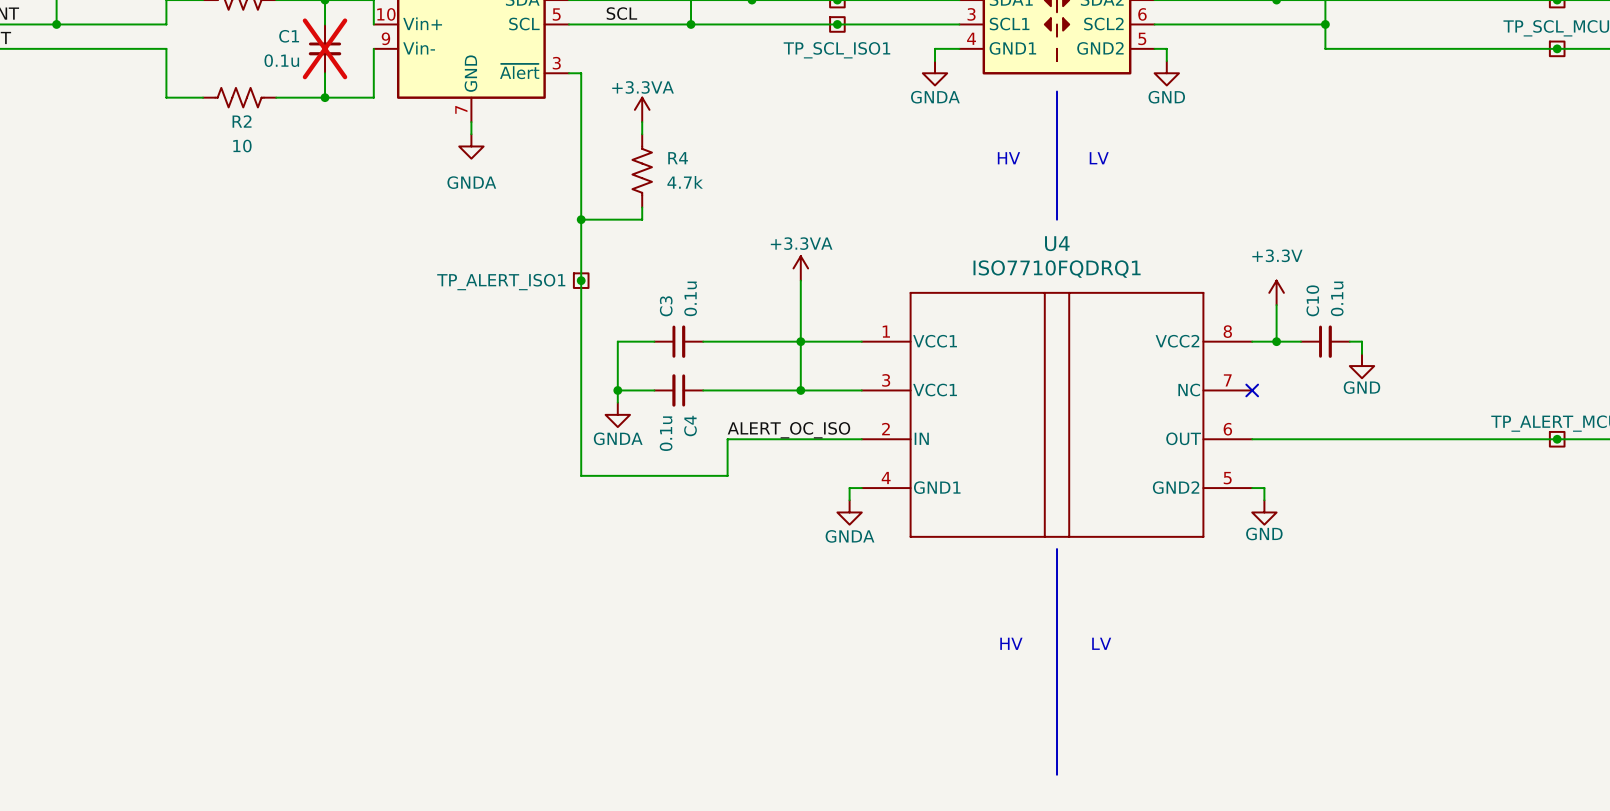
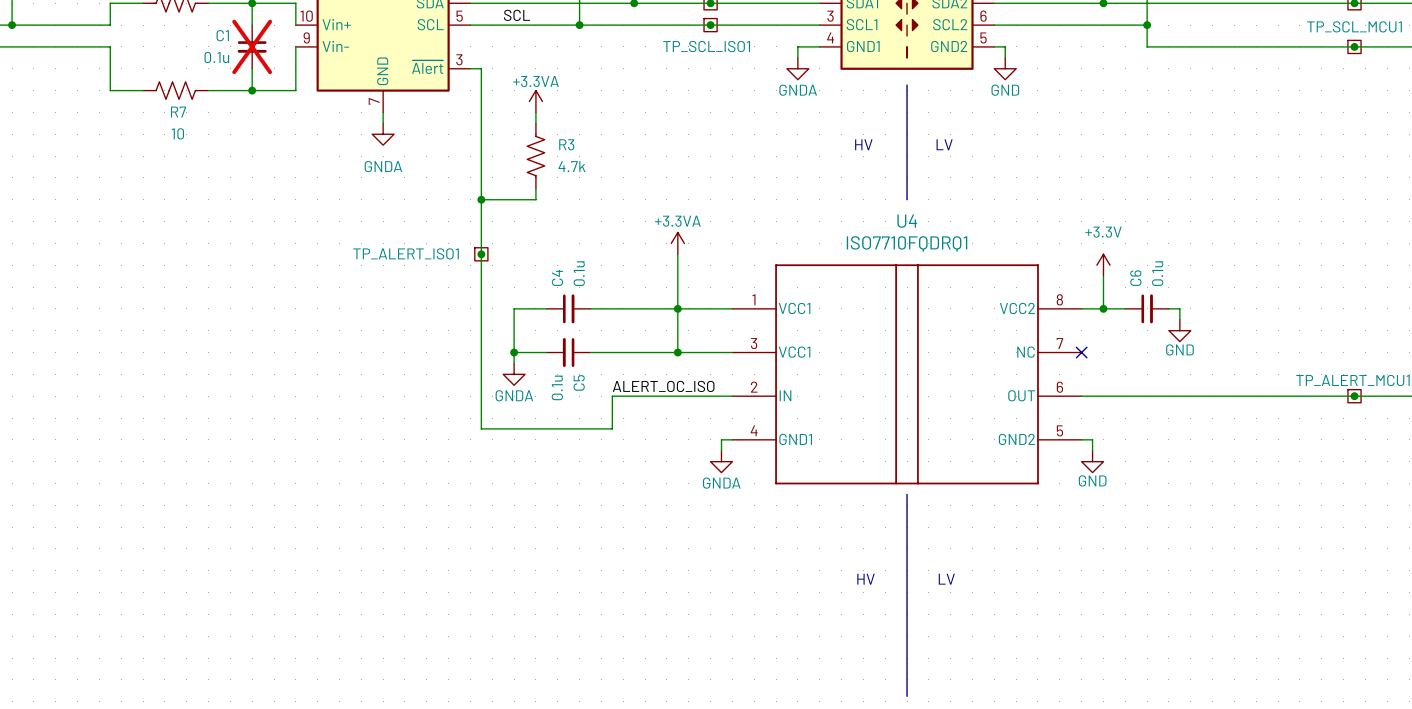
R2 name: R2 (242, 121) -> R7 (178, 112)
R4 name: R4 (678, 158) -> R3 (566, 144)
C10 name: C10 (1312, 300) -> C6 (1135, 278)
C3 name: C3 (666, 306) -> C4 (557, 277)
C4 name: C4 (690, 426) -> C5 (579, 382)

